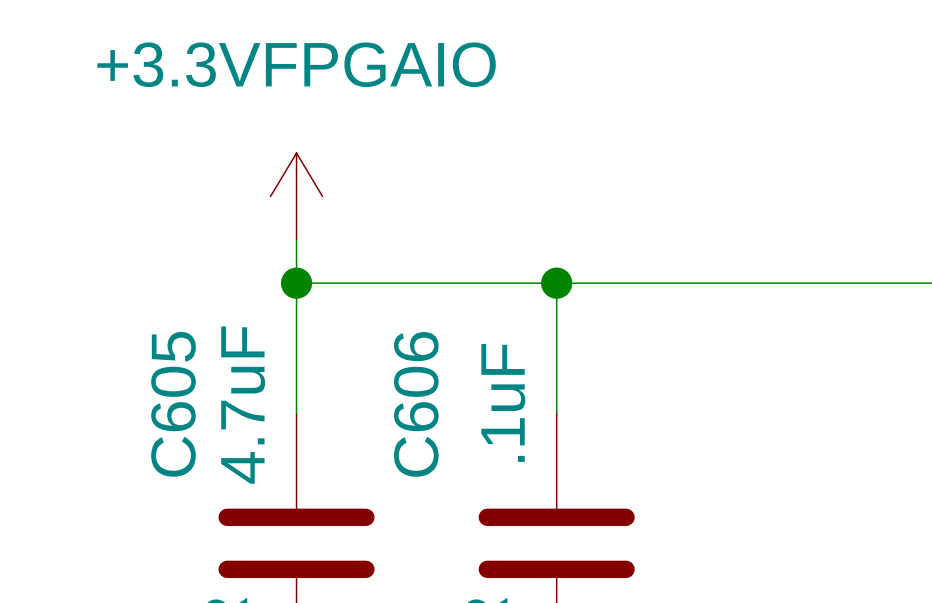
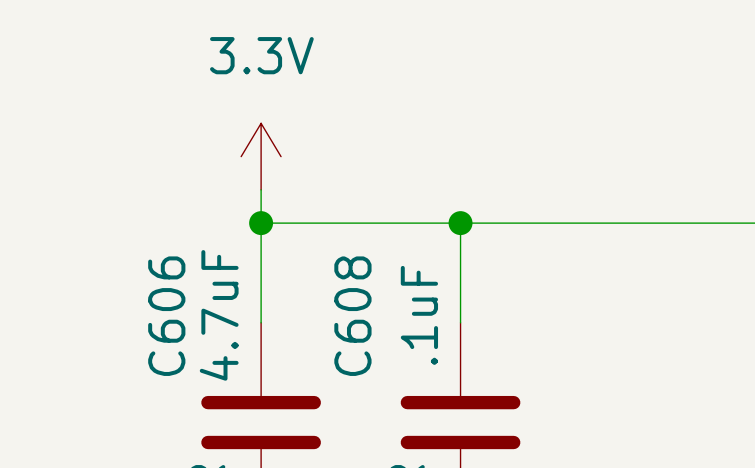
power symbol: +3.3VFPGAIO (296, 196) -> 3.3V (261, 156)
C605 name: C605 (173, 404) -> C606 (166, 316)
C606 name: C606 (416, 404) -> C608 (352, 316)

